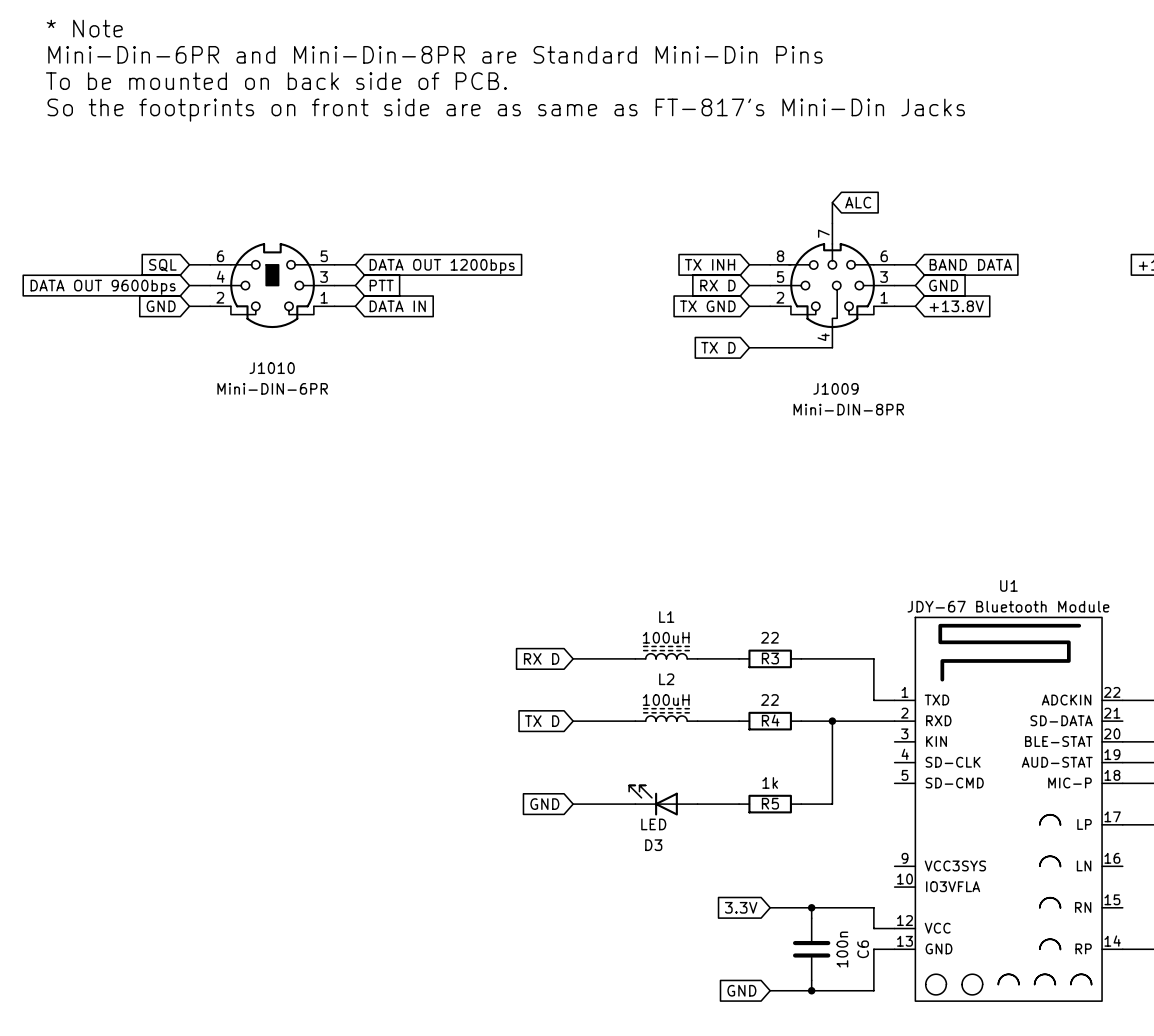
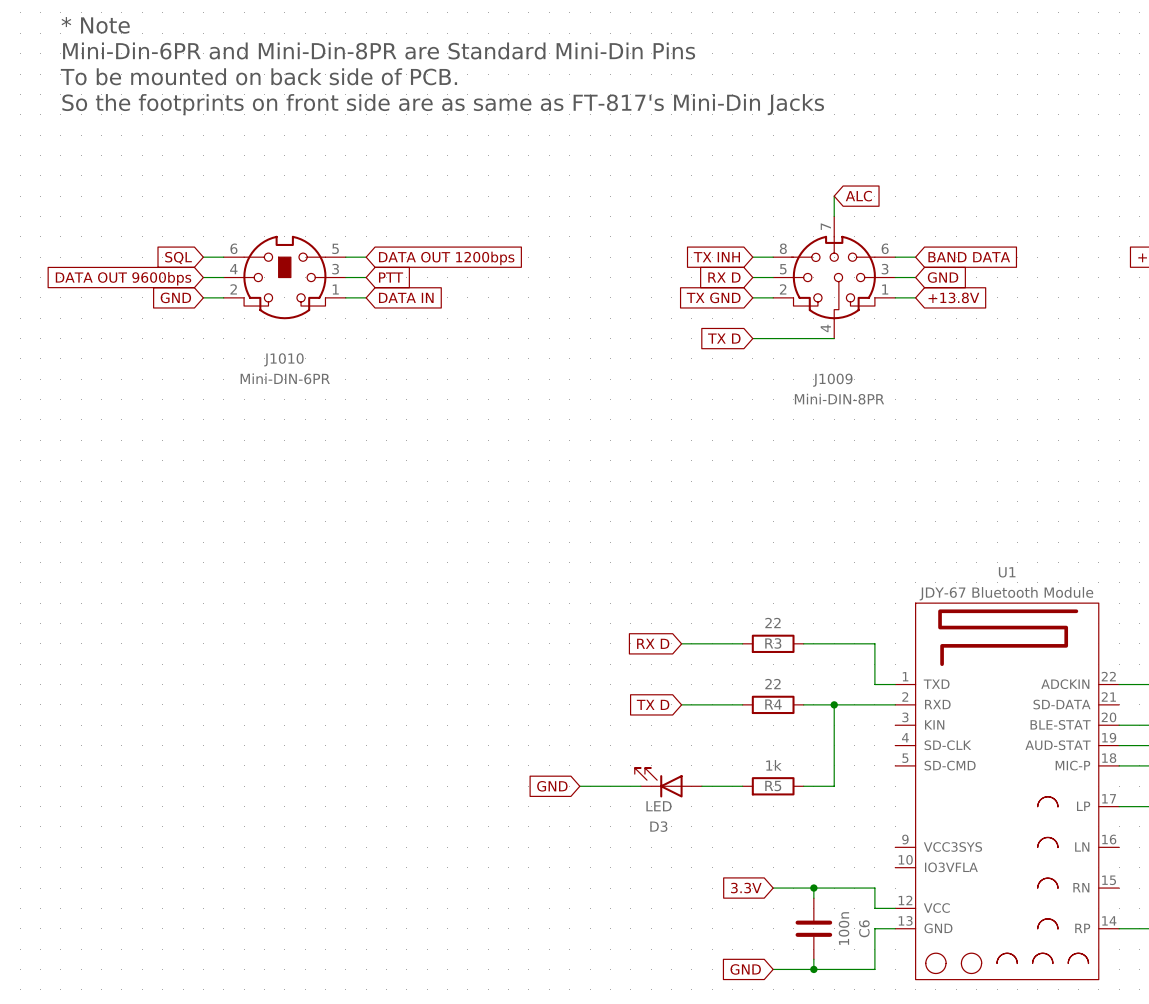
L1: 100uH (666, 652) -> none
global label position: RX D (541, 658) -> RX D (653, 643)
wire: (573, 658) (635, 658) -> none
L2: 100uH (666, 714) -> none
global label position: TX D (542, 721) -> TX D (653, 704)
wire: (573, 721) (635, 721) -> none

